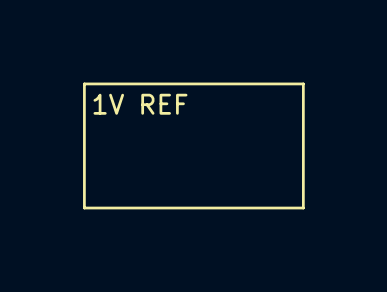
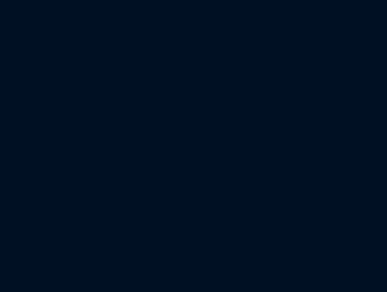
line: (84, 83) (303, 83) (303, 208) (84, 208) (84, 83) -> none
text: 1V REF (140, 104) -> none

